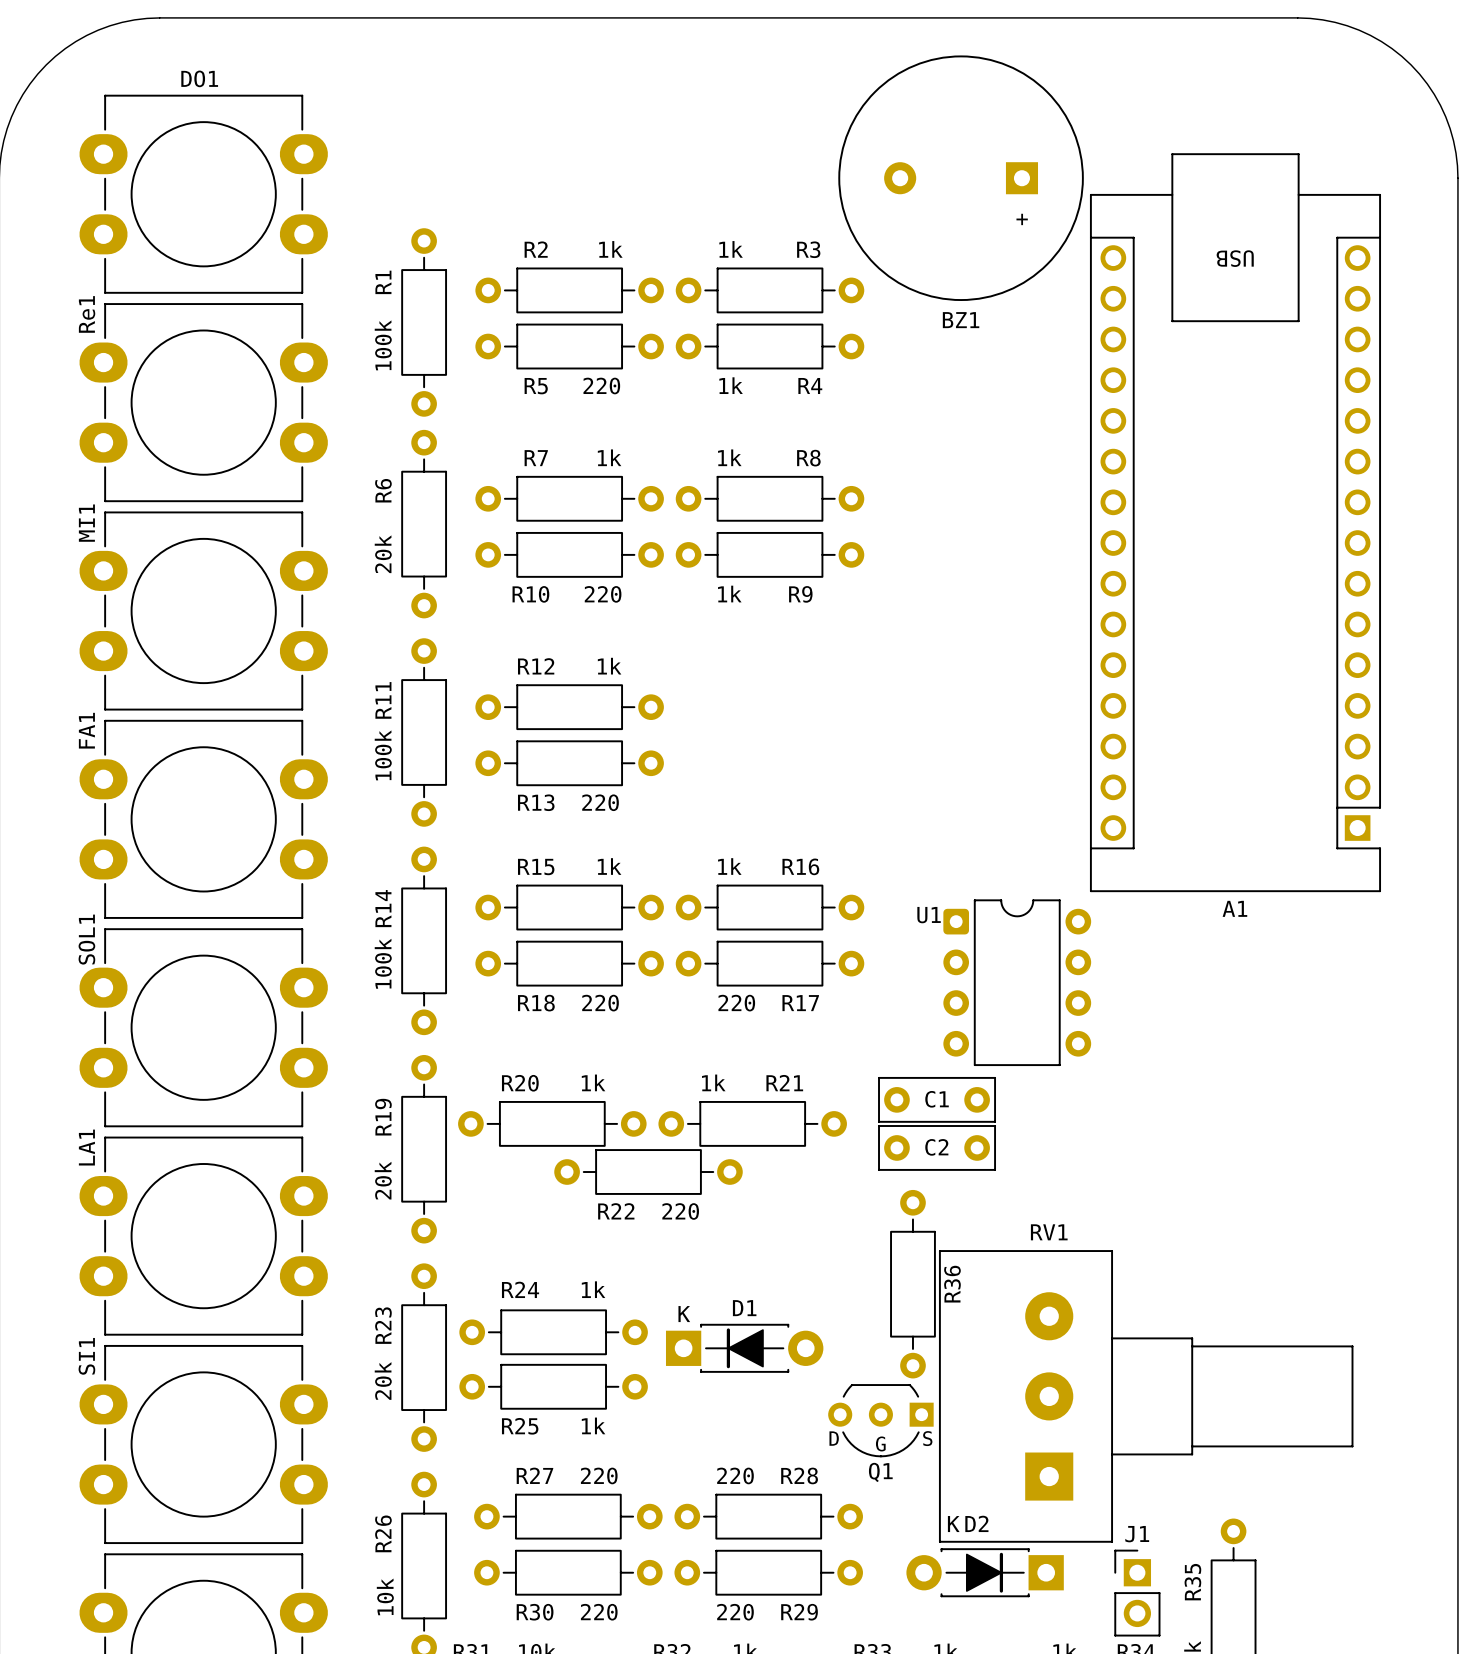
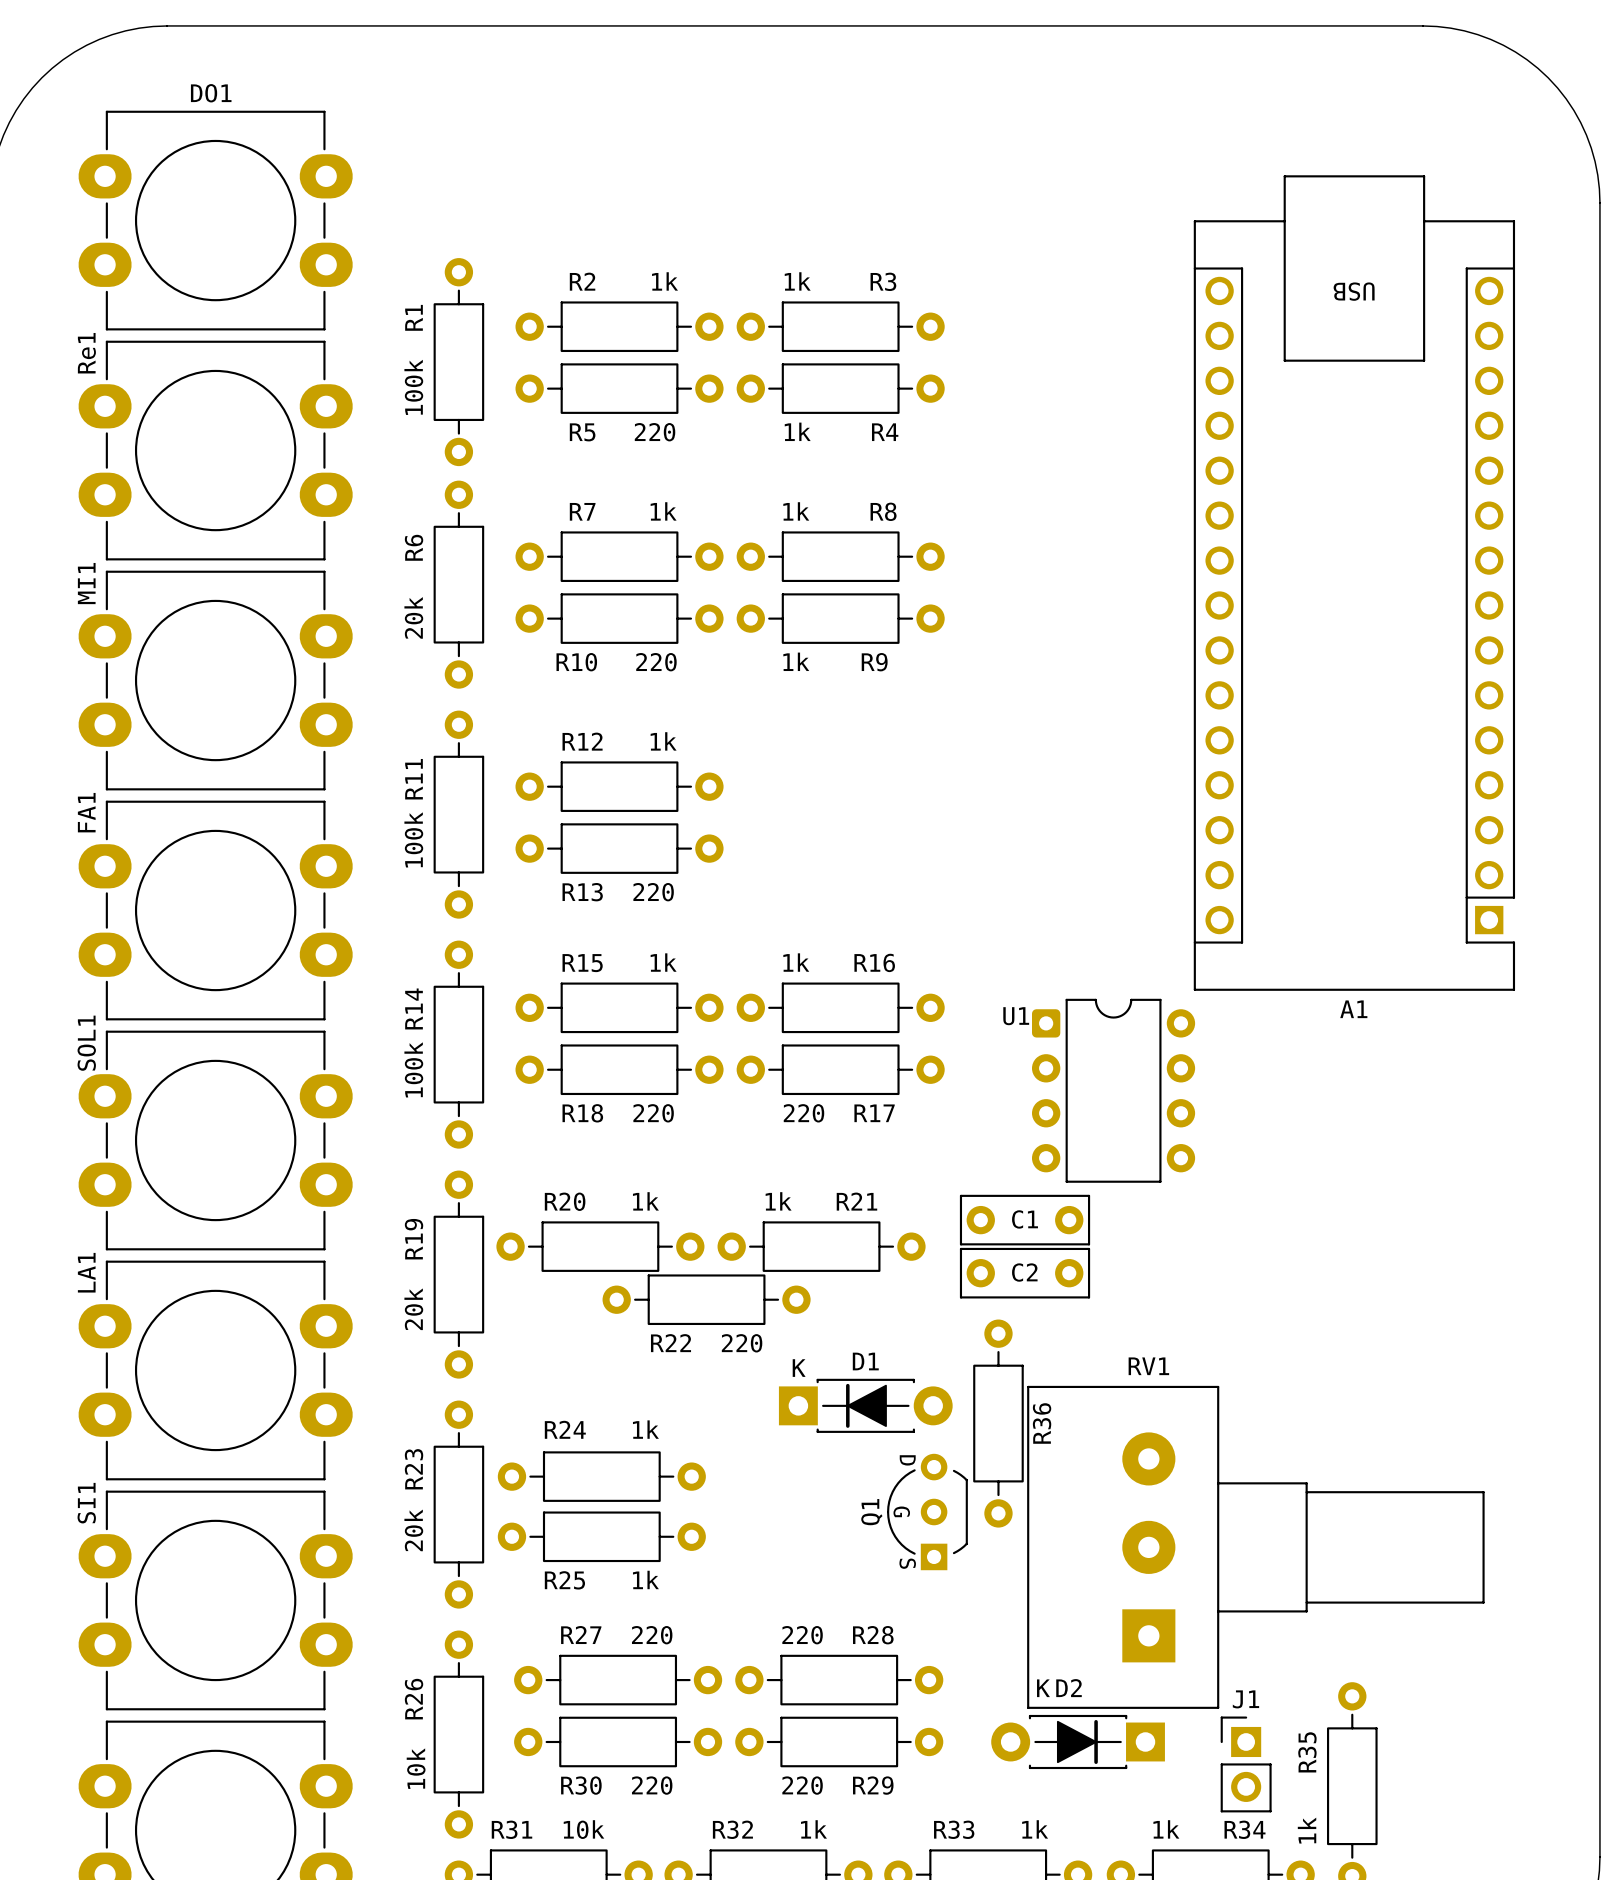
BZ1: (961, 178) -> none
D1 position: (744, 1348) -> (865, 1405)
Q1 rotation: 0° (880, 1420) -> 90° clockwise (927, 1512)
Q1 position: (880, 1420) -> (927, 1512)

